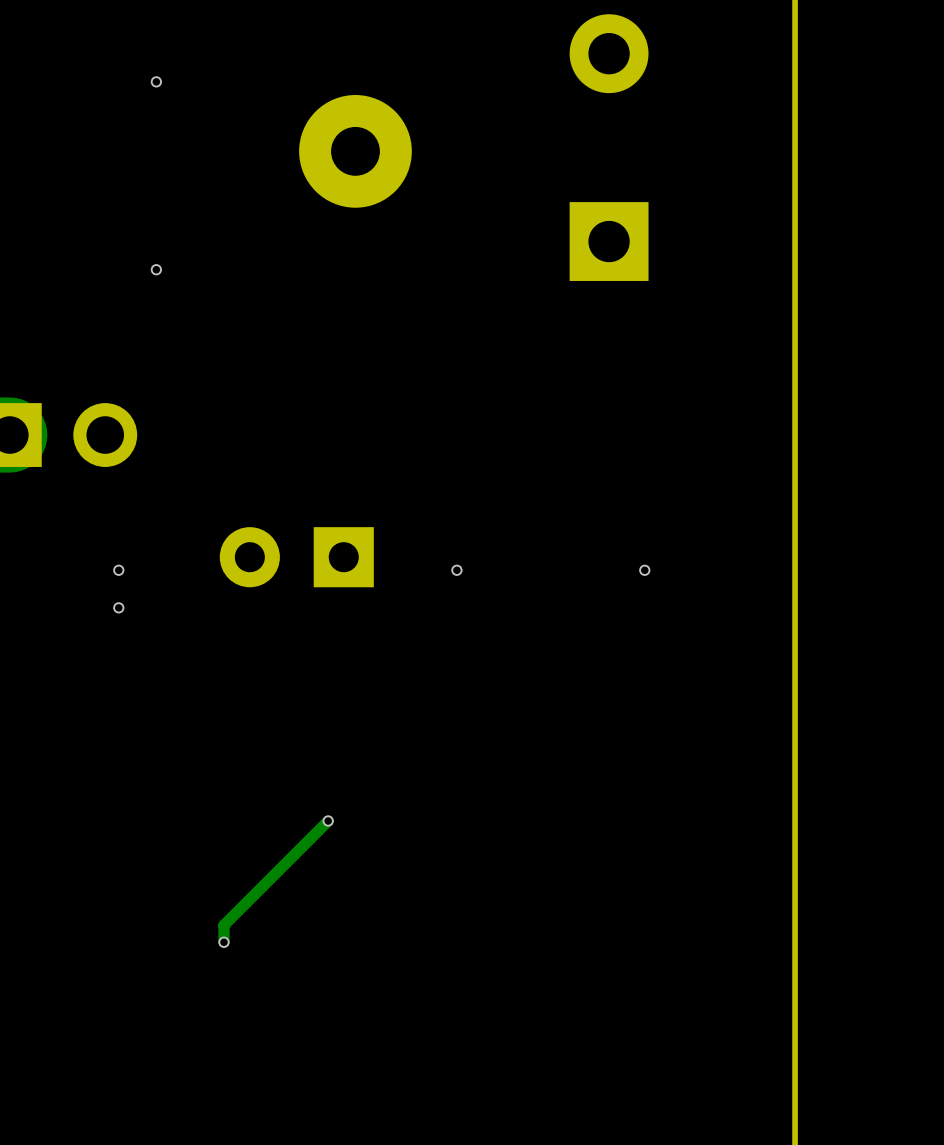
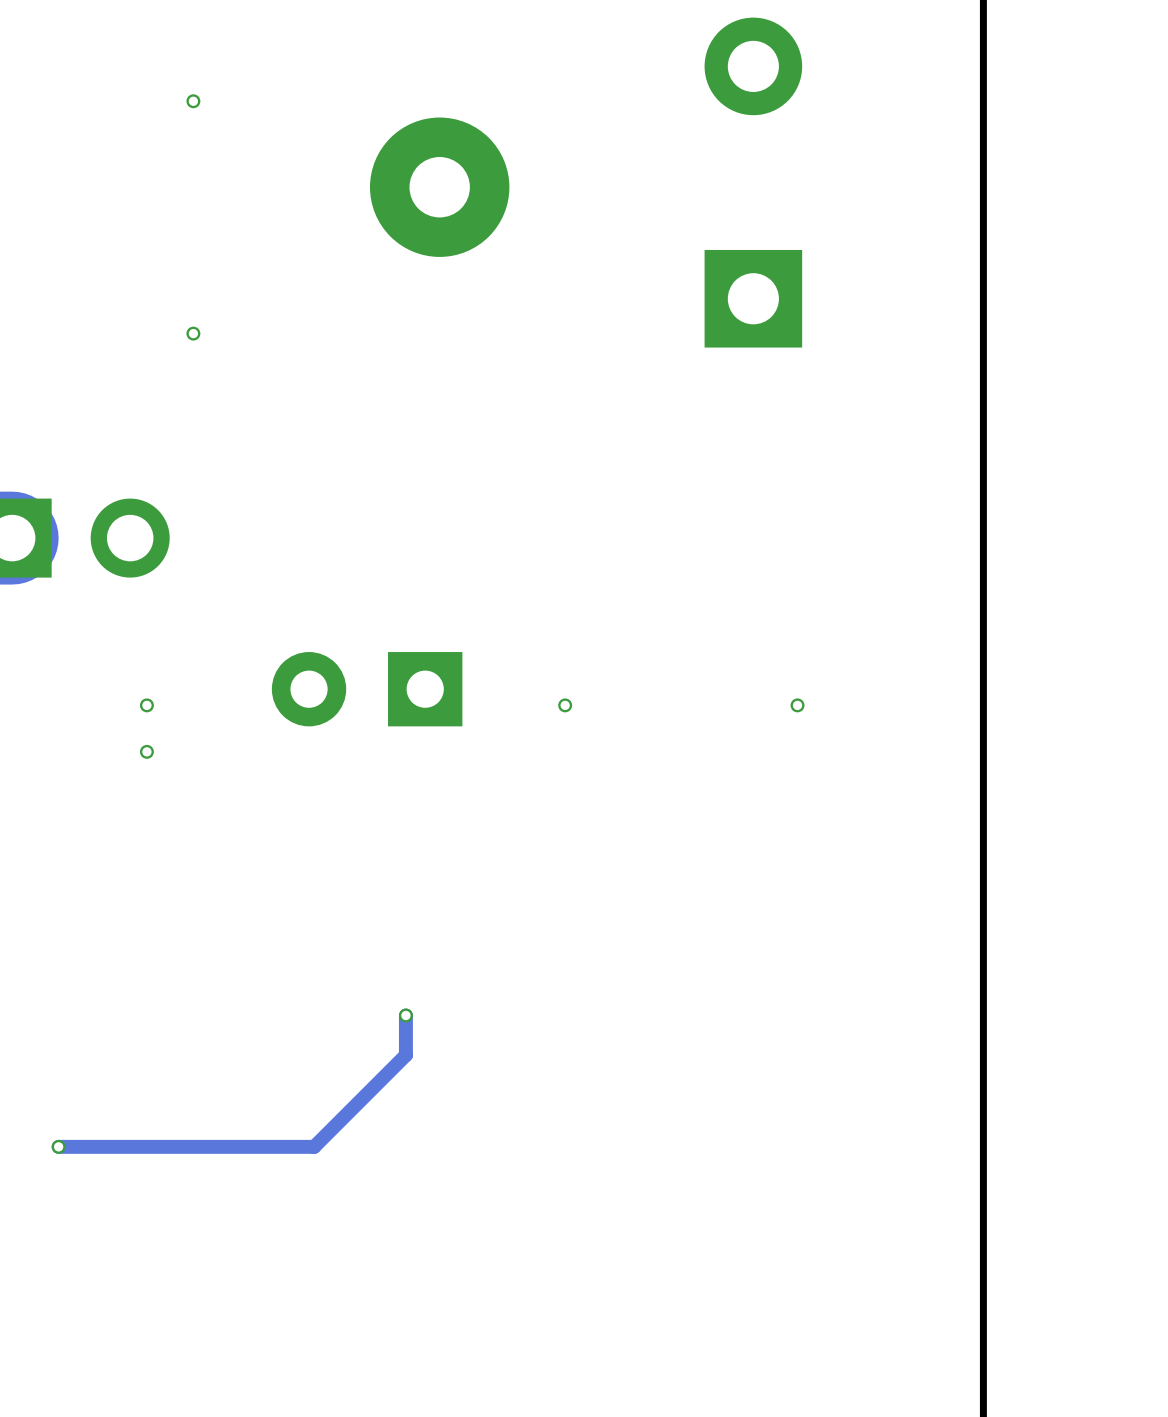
track: (328, 821) (223, 925) (223, 942) -> (405, 1015) (405, 1055) (314, 1146) (58, 1146)
via position: (223, 942) -> (58, 1146)

